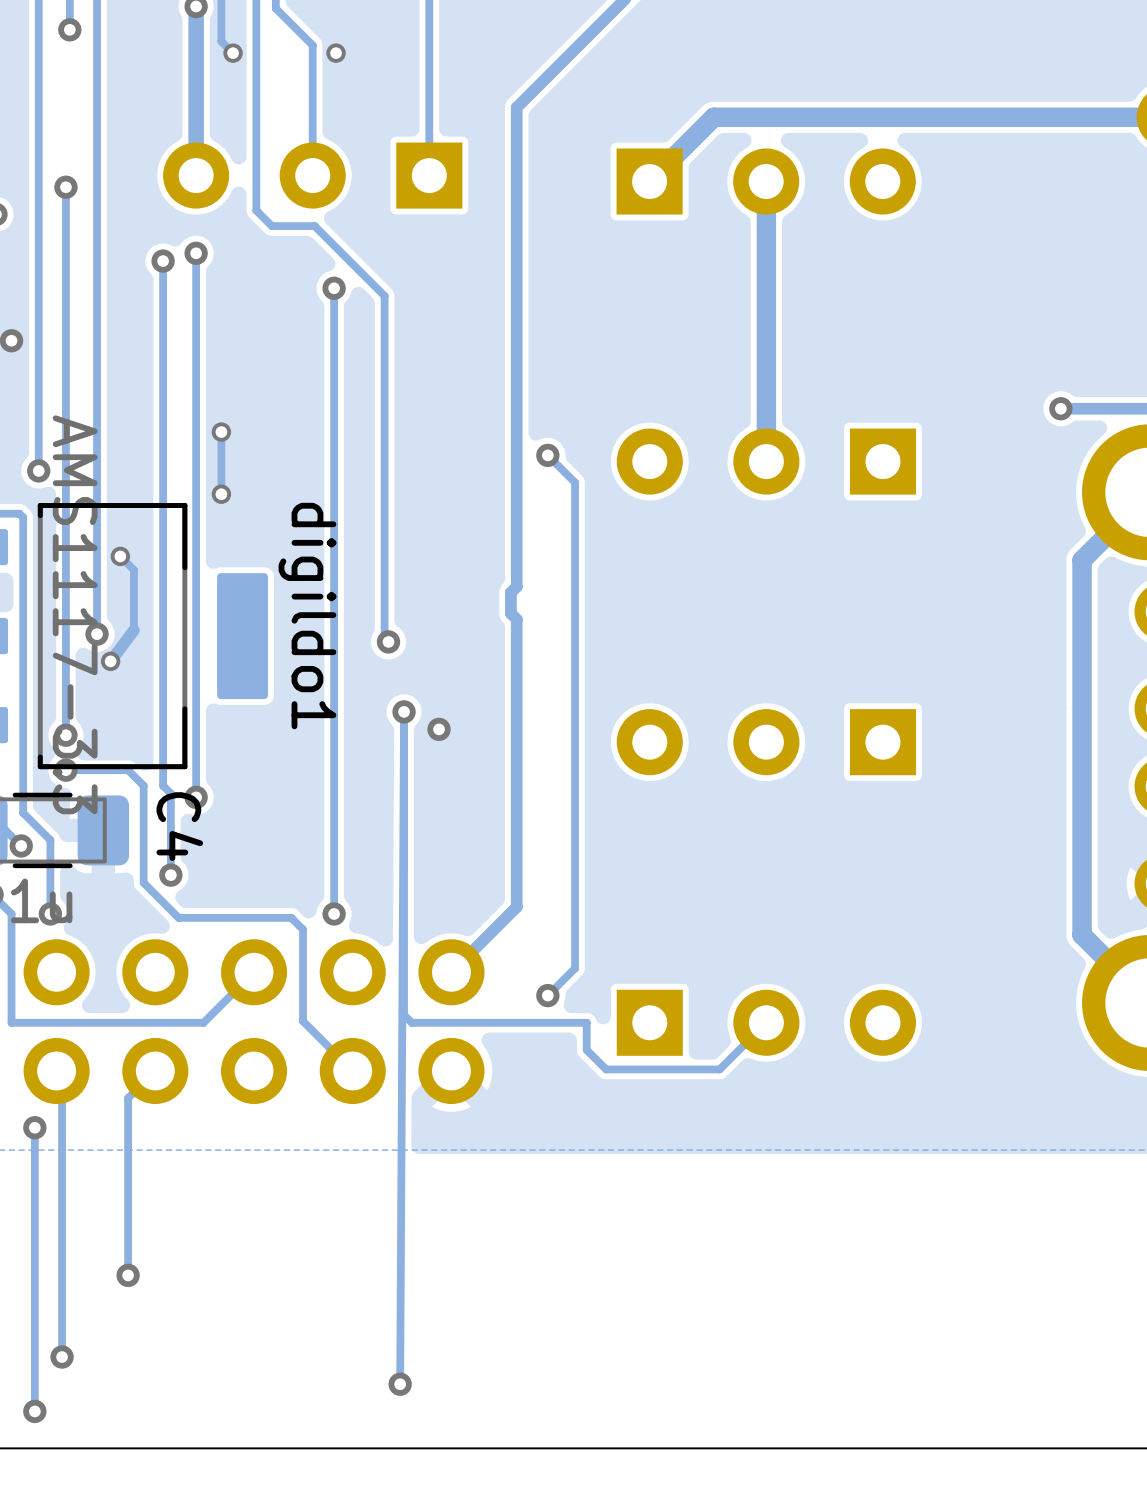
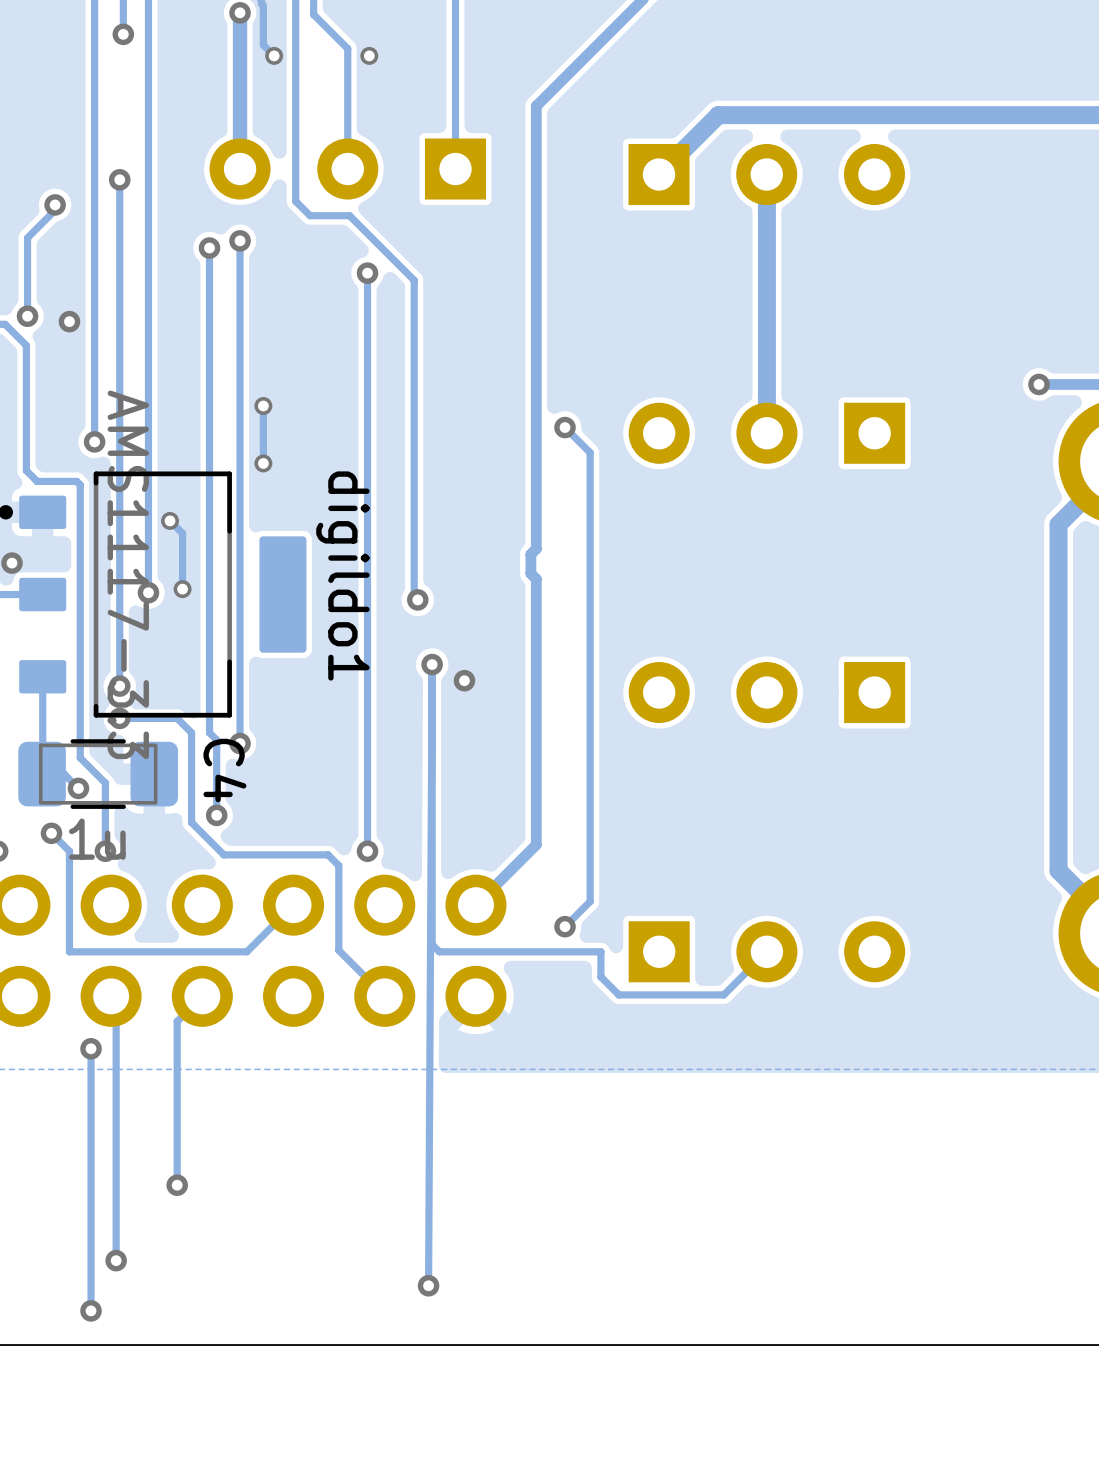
track: (133, 630) (110, 661) -> none
via position: (110, 661) -> (182, 589)

